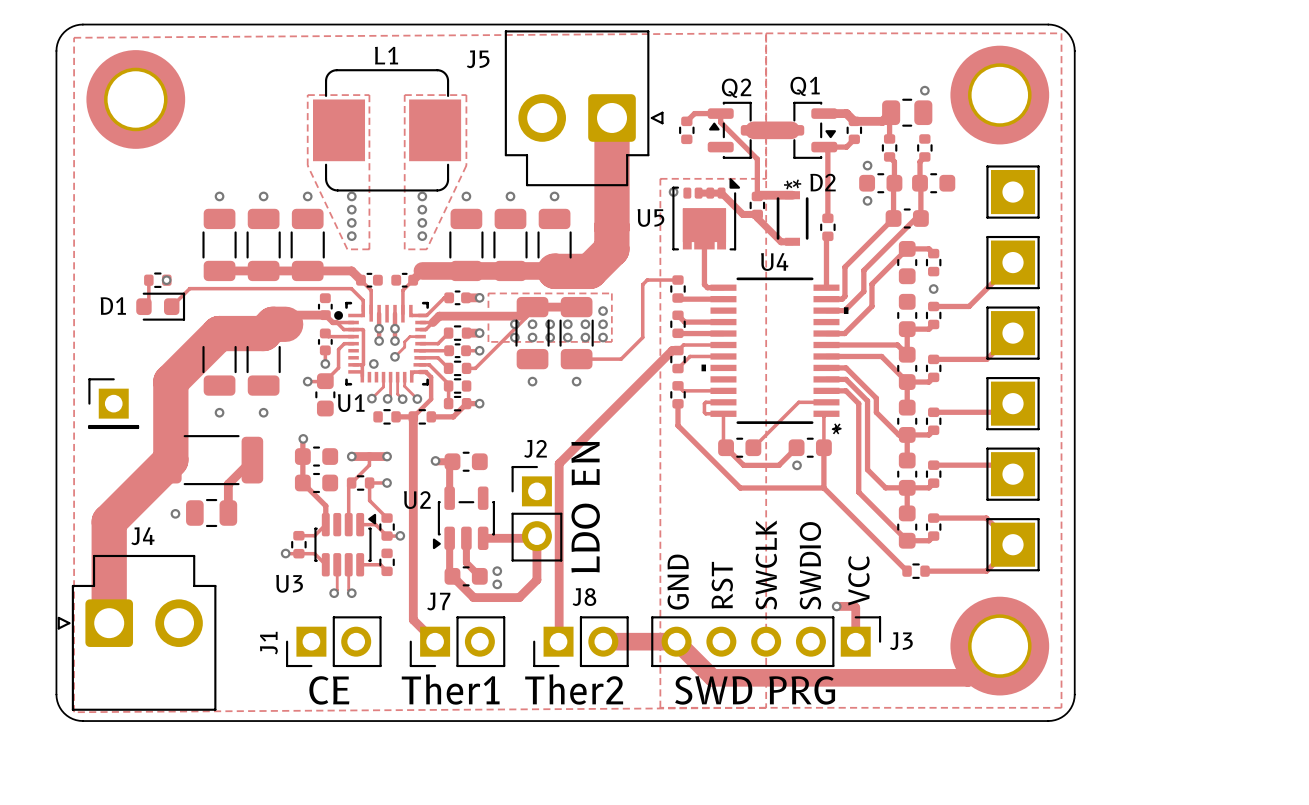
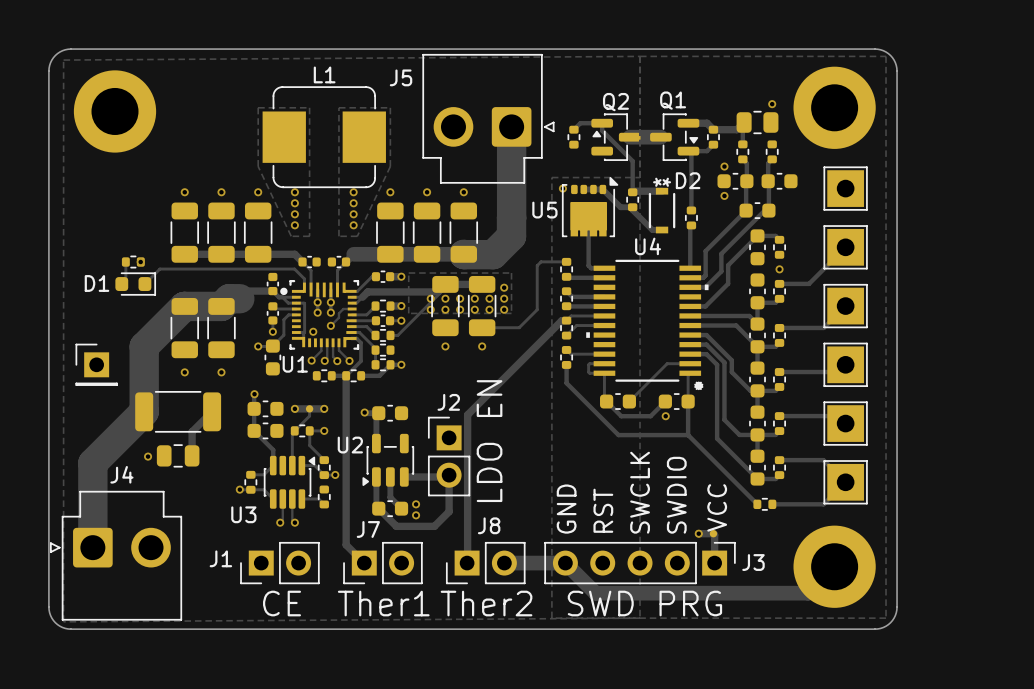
J1 name rotation: 0° (268, 643) -> 90° clockwise (220, 558)

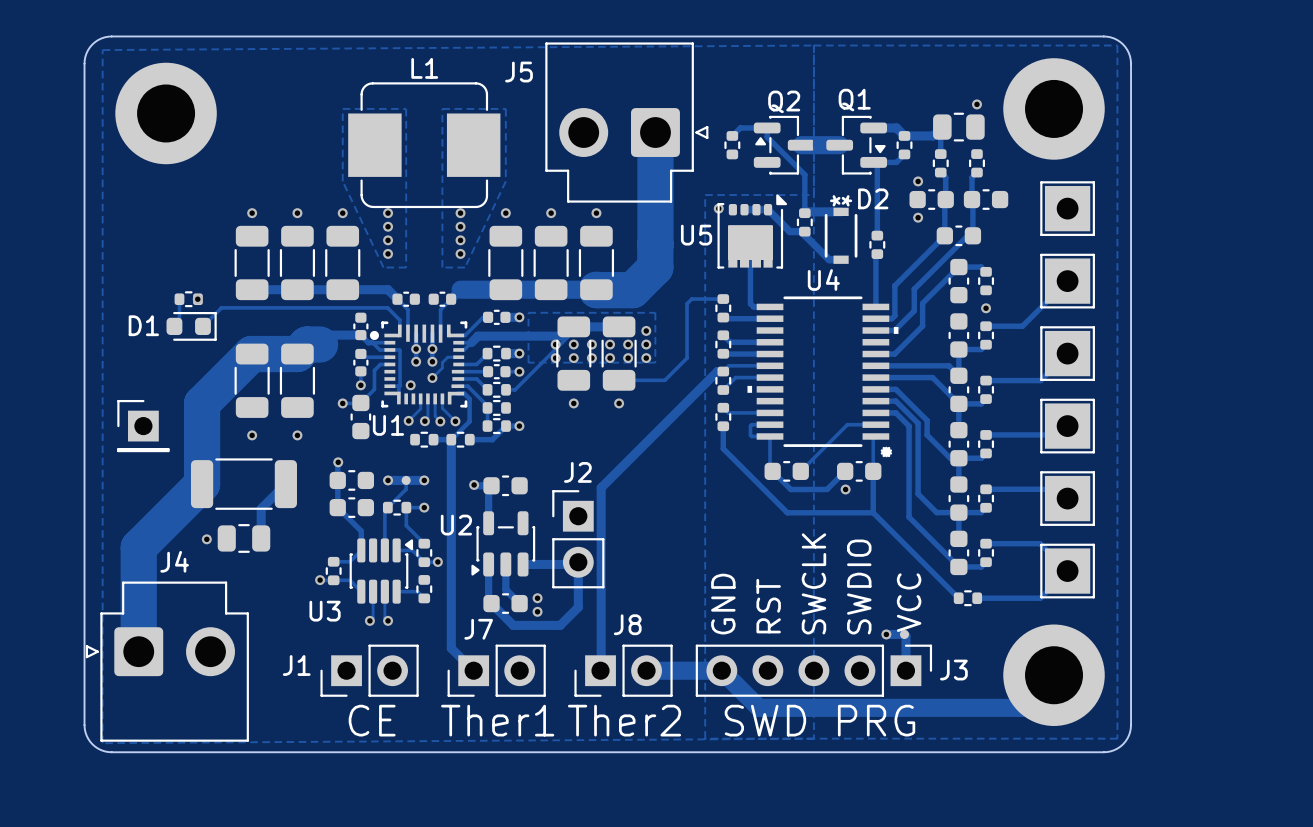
text: LDO EN (489, 441) -> none

